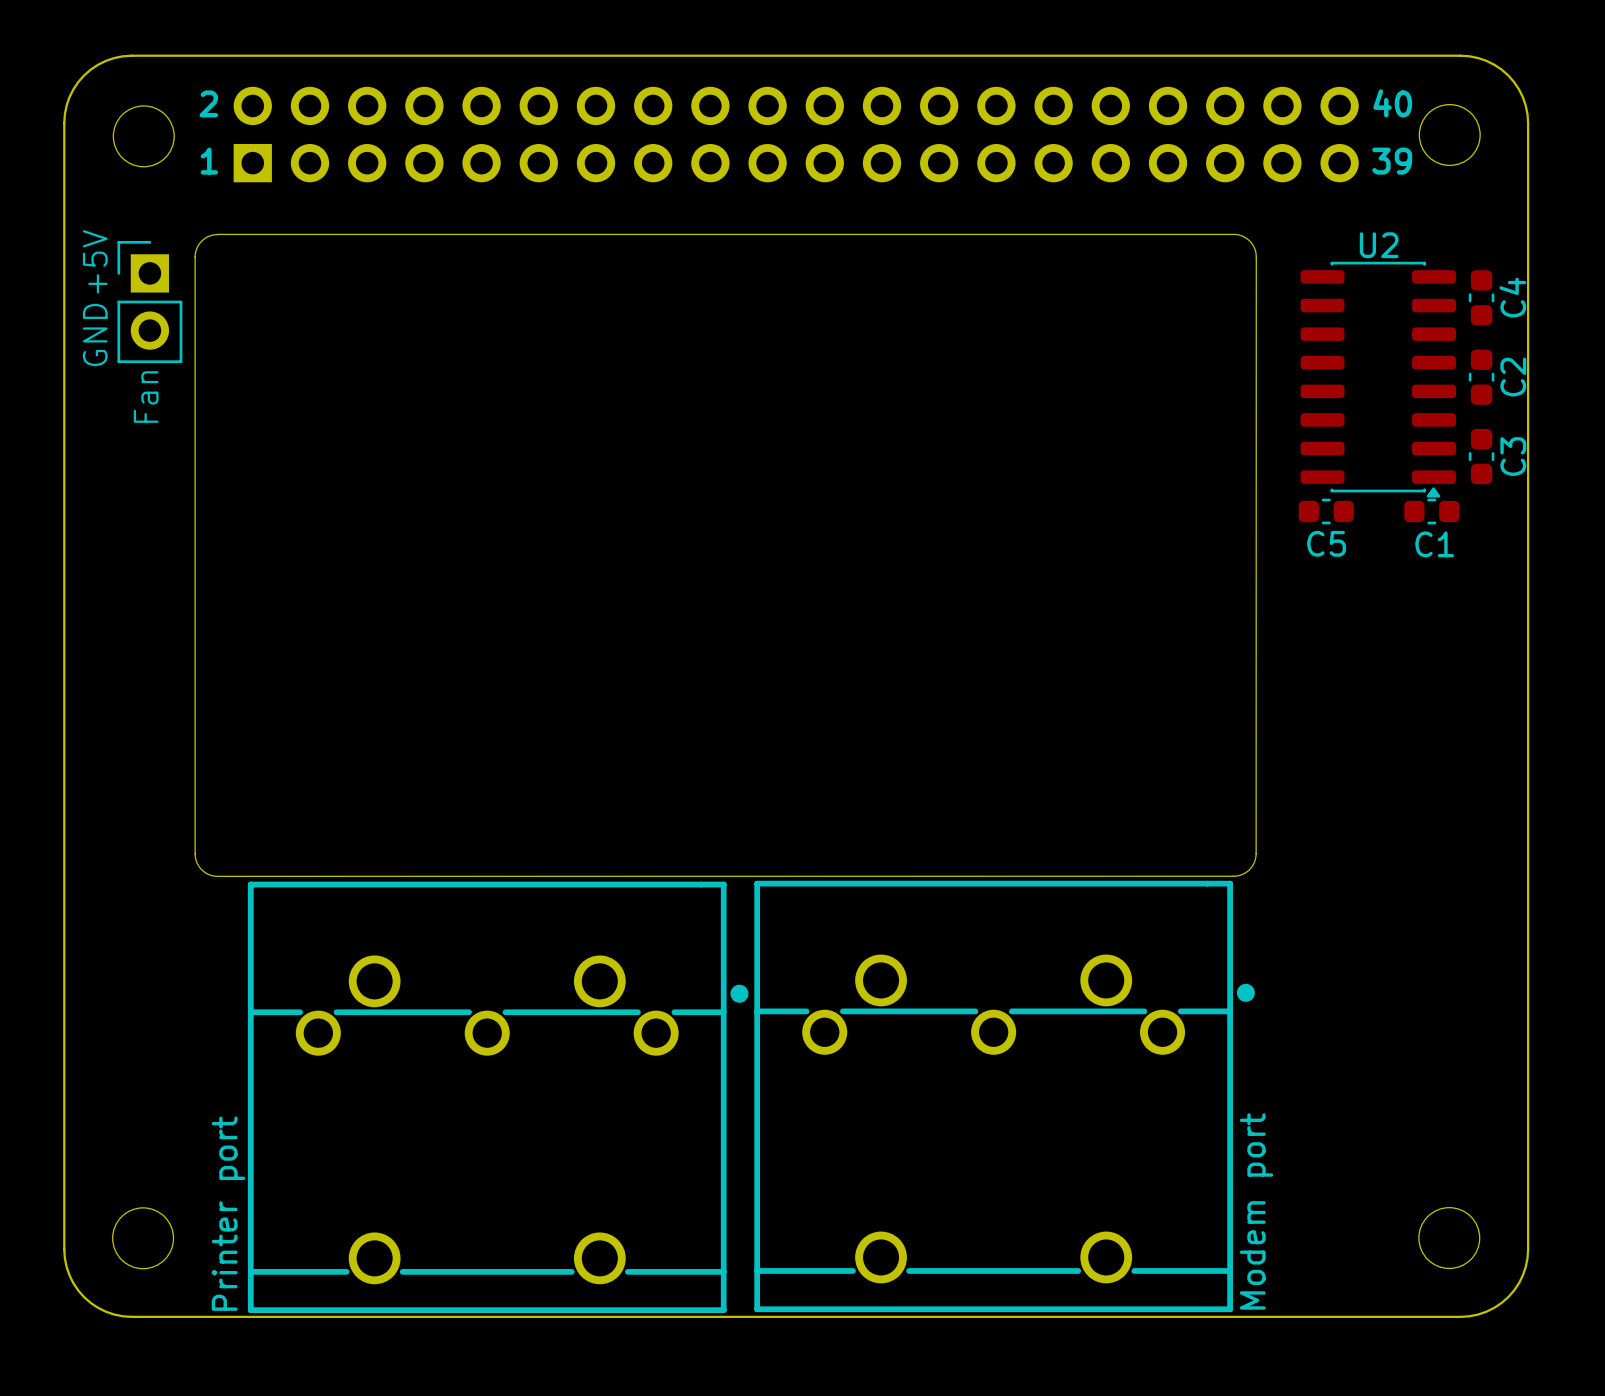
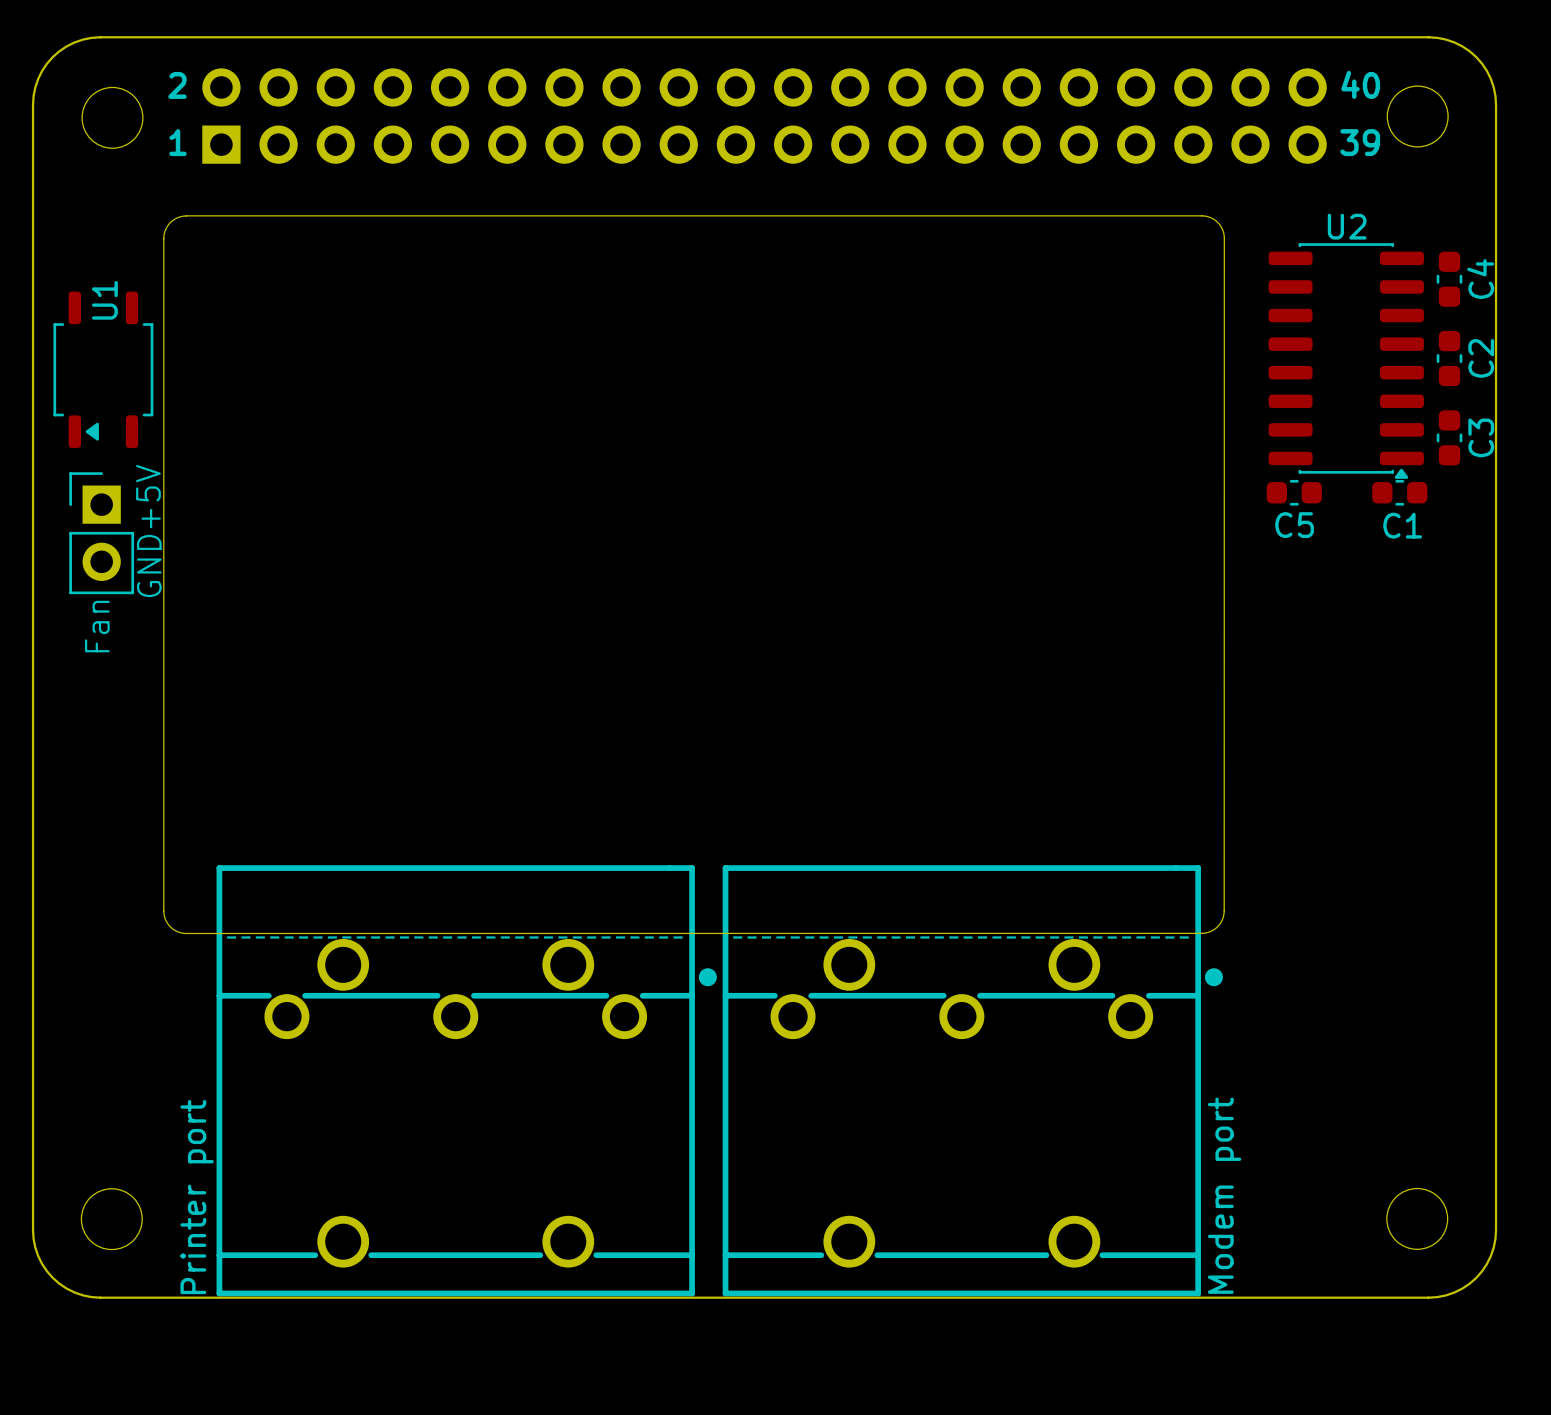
board edge: (1256, 256) (1256, 853) (1253, 864) (1244, 873) (1233, 876) (217, 876) (210, 875) (201, 869) (197, 863) (195, 853) -> (1224, 238) (1224, 910) (1221, 922) (1212, 930) (1201, 933) (183, 933) (172, 928) (164, 915) (163, 834)
text position: +5V (95, 261) -> +5V (148, 496)
part position: (149, 302) -> (101, 533)
text position: GND (95, 334) -> GND (149, 565)
U1: none -> (103, 369)
text position: Fan (146, 397) -> Fan (97, 626)
part footprint: [754, 880, 1255, 1313] -> [722, 865, 1223, 1297]
part footprint: [247, 881, 749, 1314] -> [216, 865, 717, 1297]

